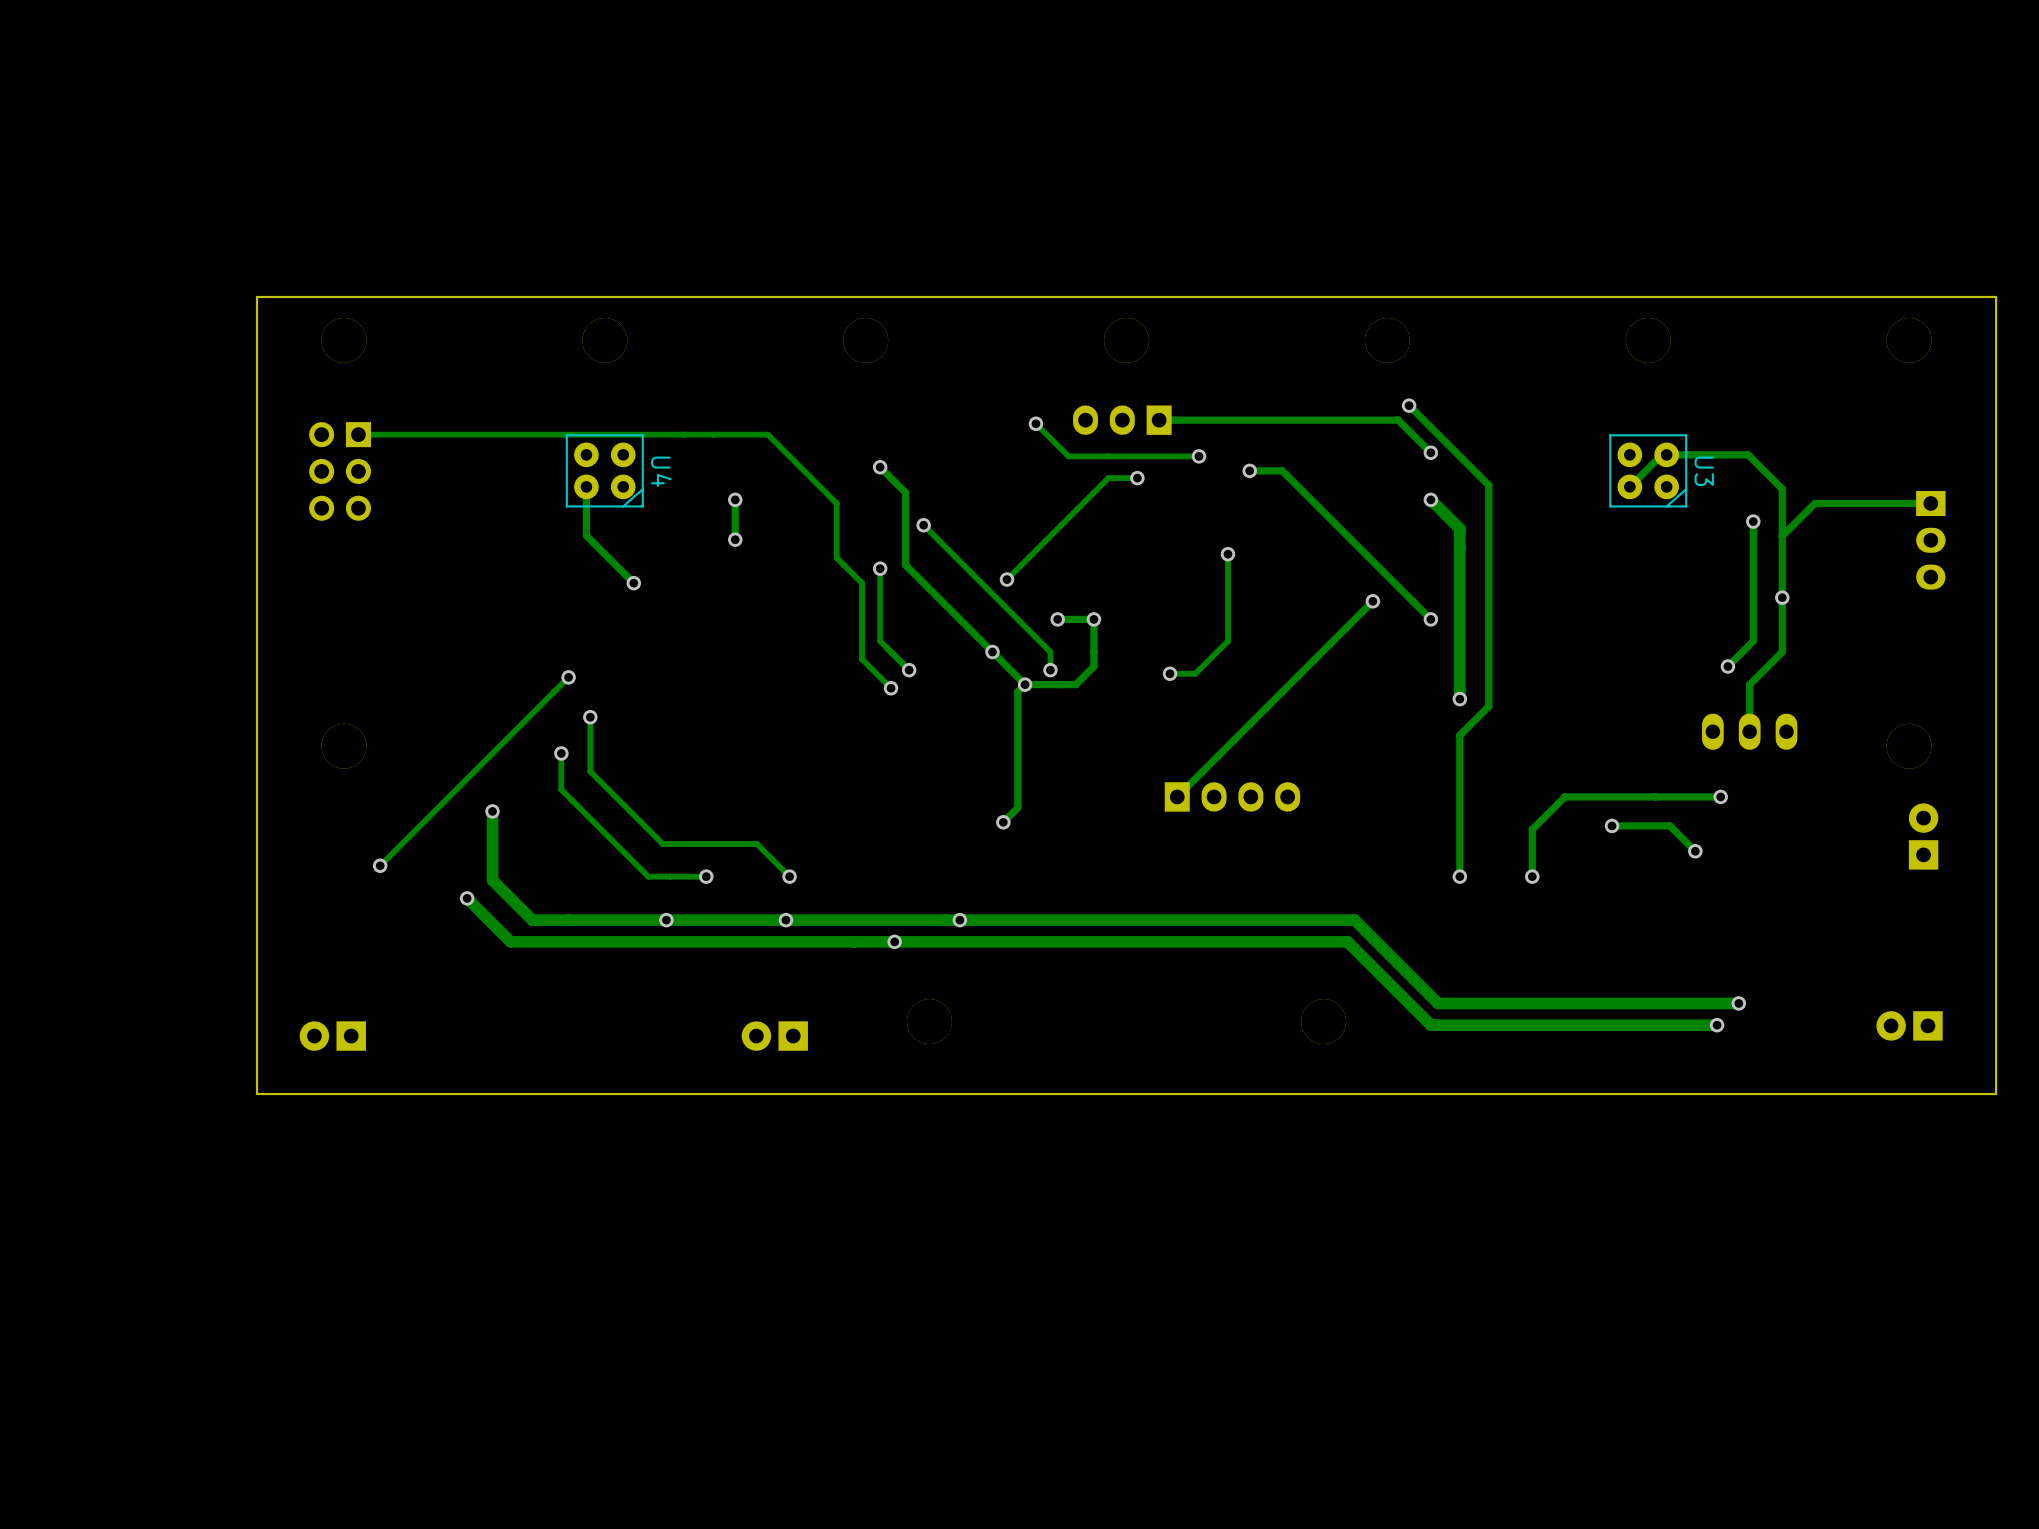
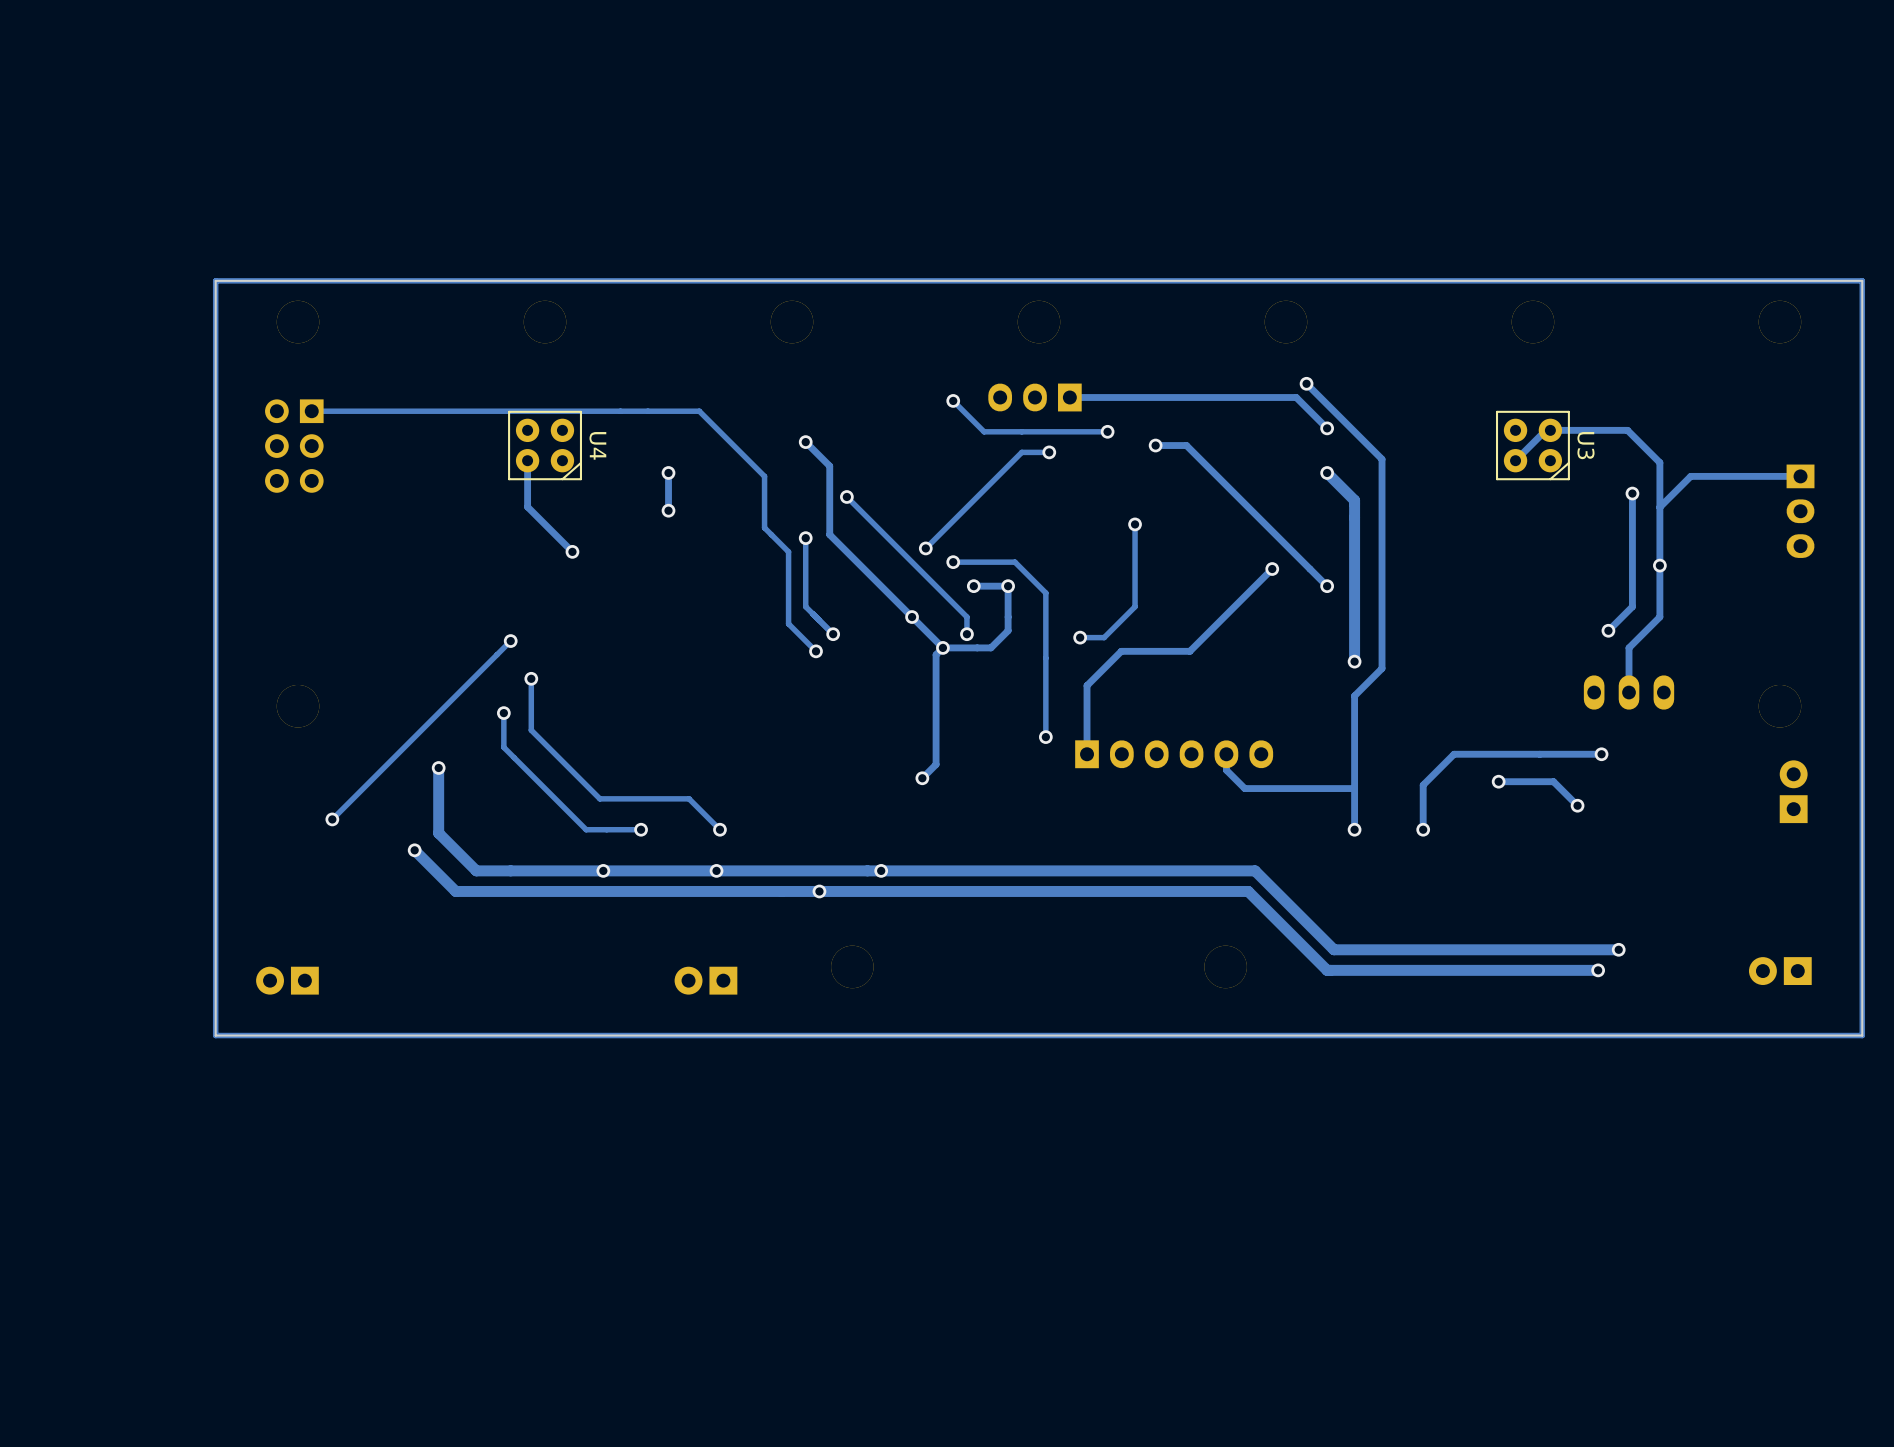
track: none -> (1862, 280) (1862, 1035) (215, 1035) (215, 280) (1862, 280)
track: none -> (953, 562) (1014, 562) (1045, 593) (1045, 737)
via: none -> (953, 562)
track: (1285, 688) (1177, 796) -> (1189, 651) (1121, 651) (1087, 685) (1087, 754)
via: none -> (1045, 737)
part: (1232, 796) -> none
part: none -> (1174, 754)
track: none -> (1226, 754) (1226, 770) (1244, 788) (1354, 788)

